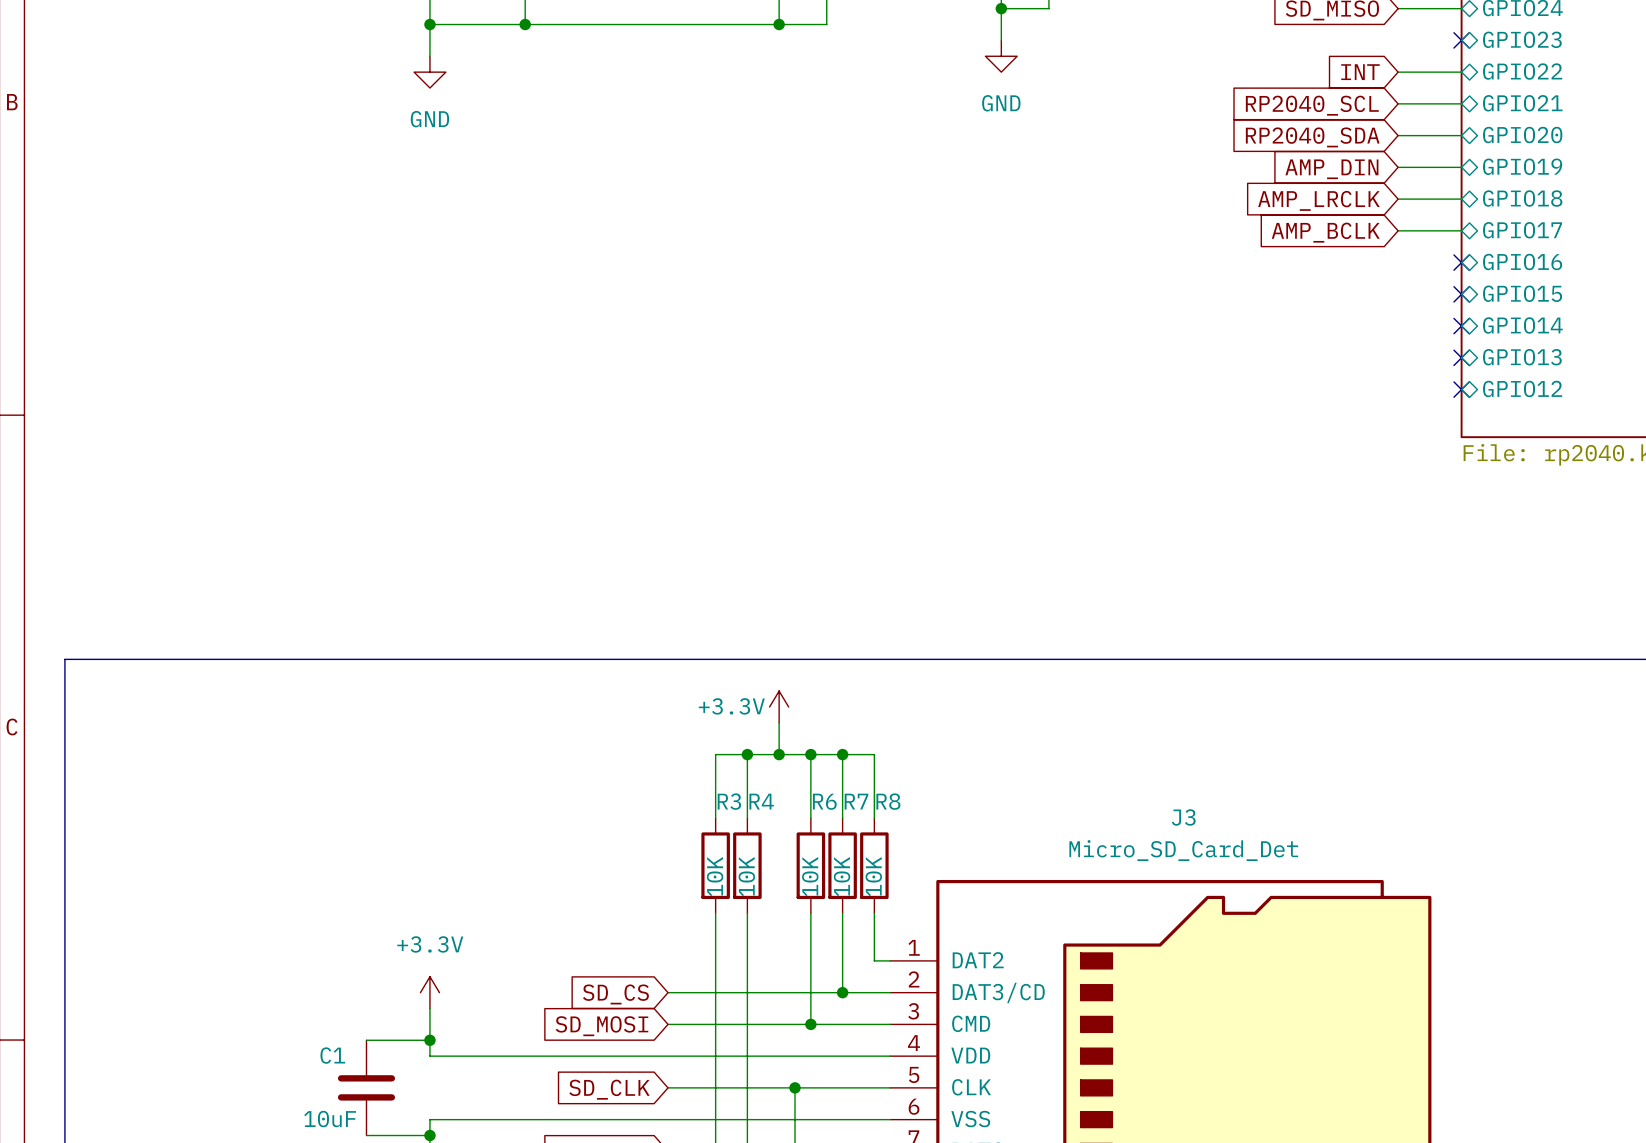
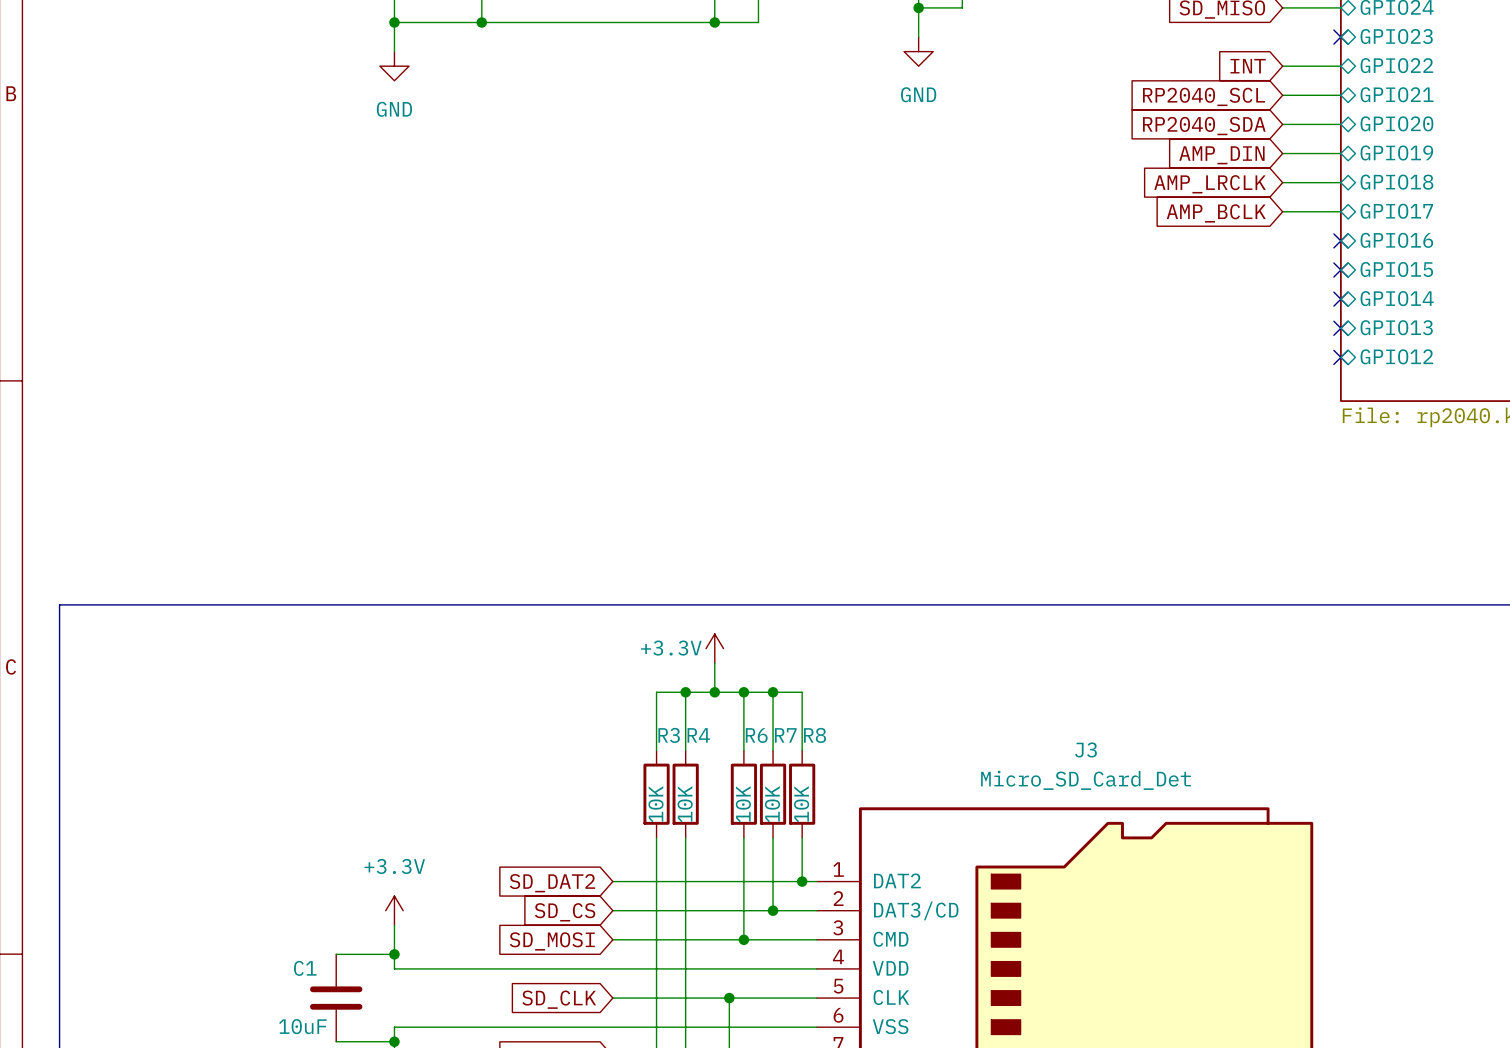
wire: none -> (612, 881) (802, 881)
junction: none -> (802, 881)
global label: none -> SD_DAT2 (552, 883)

